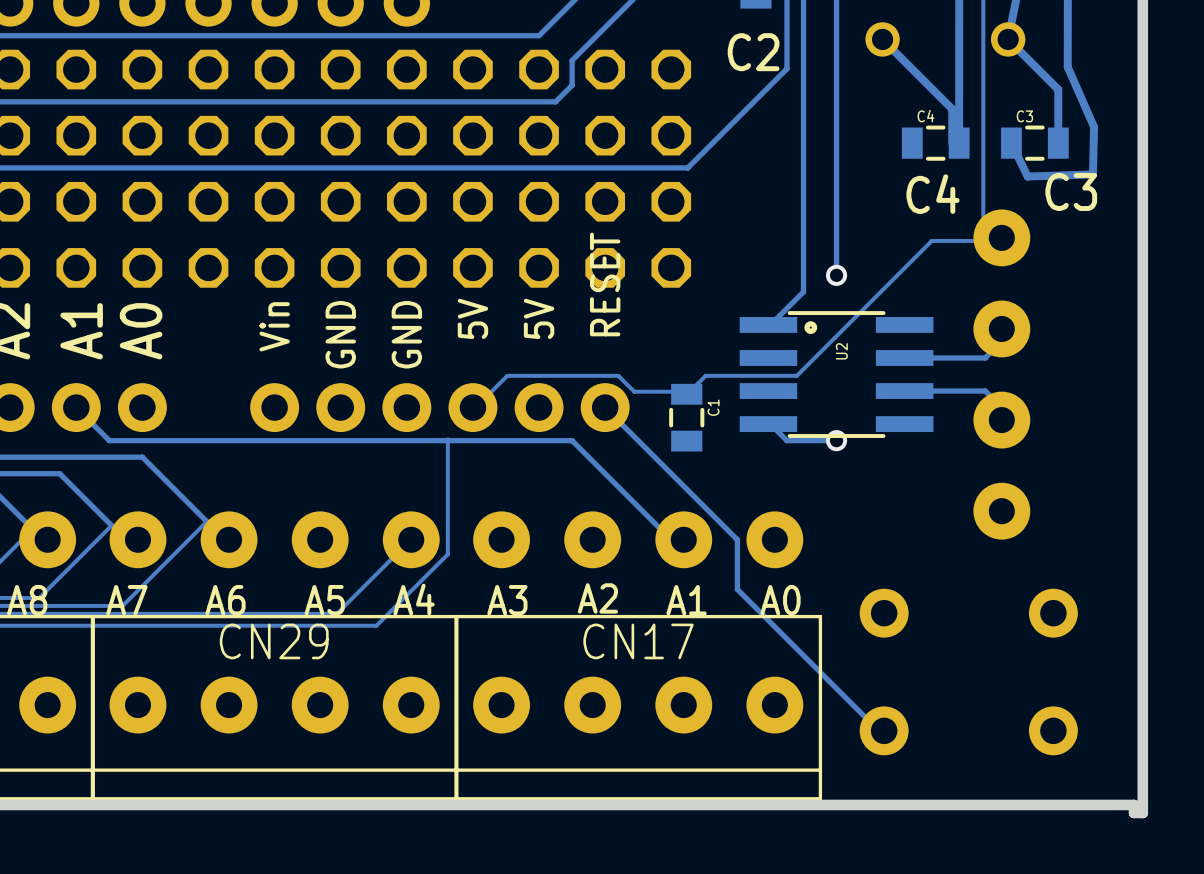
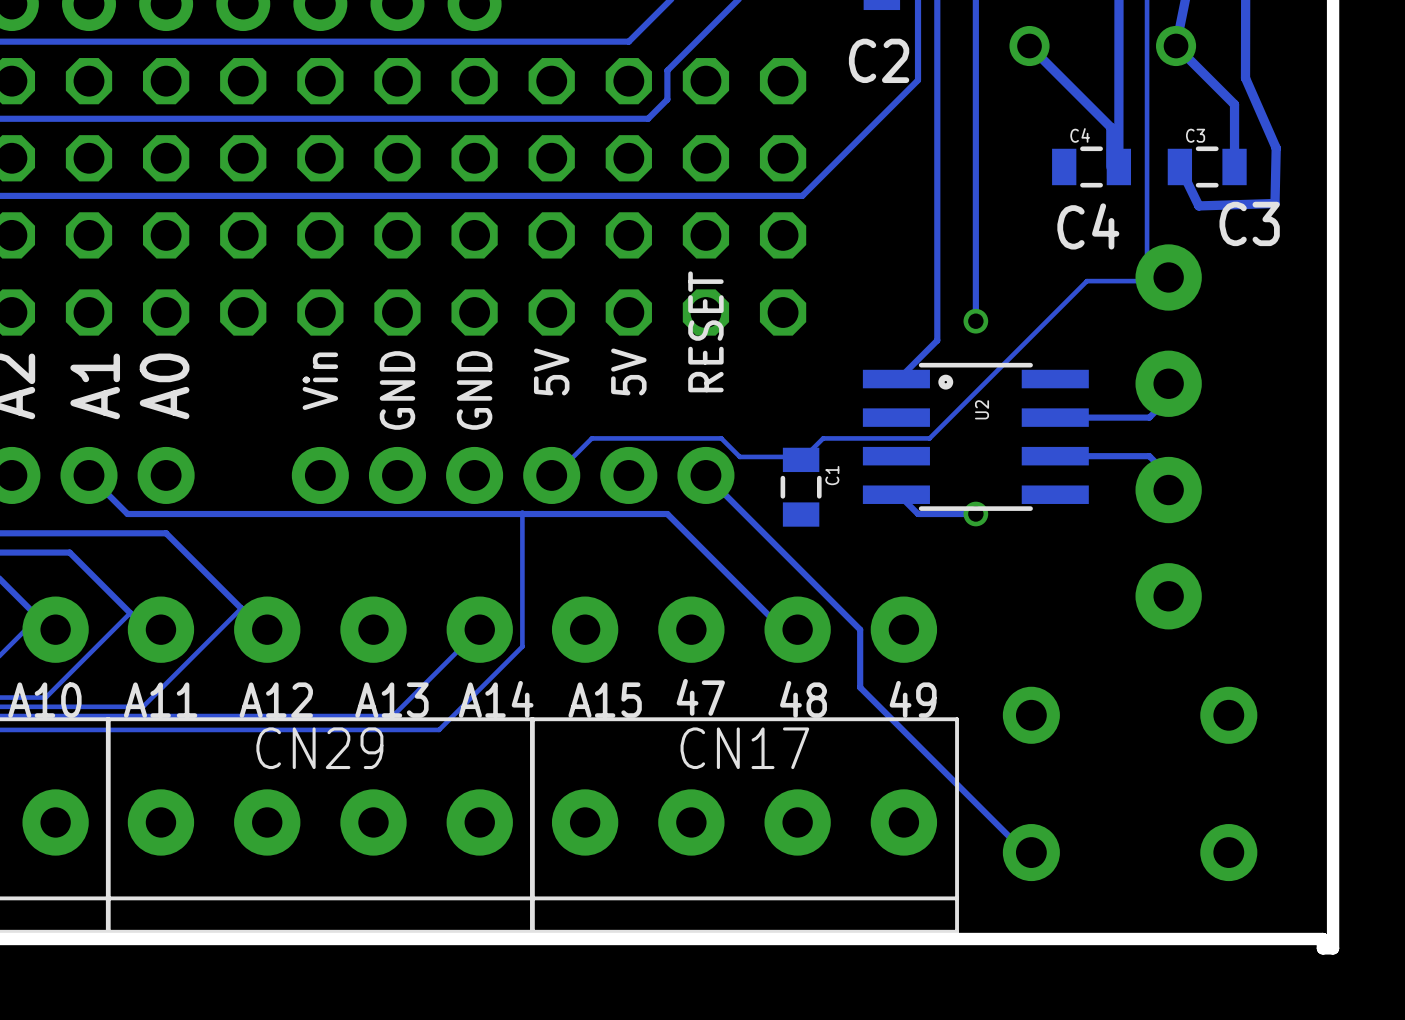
text: A2 (597, 598) -> 47 (700, 697)
text: A4 (414, 599) -> A14 (496, 699)
text: A8 (27, 600) -> A10 (44, 700)
text: A7 (126, 600) -> A11 (160, 700)
text: A6 (225, 600) -> A12 (276, 700)
text: A5 (324, 600) -> A13 (391, 700)
text: A3 (507, 600) -> A15 (605, 700)
text: A1 (686, 600) -> 48 (803, 699)
text: A0 (780, 600) -> 49 (913, 699)

